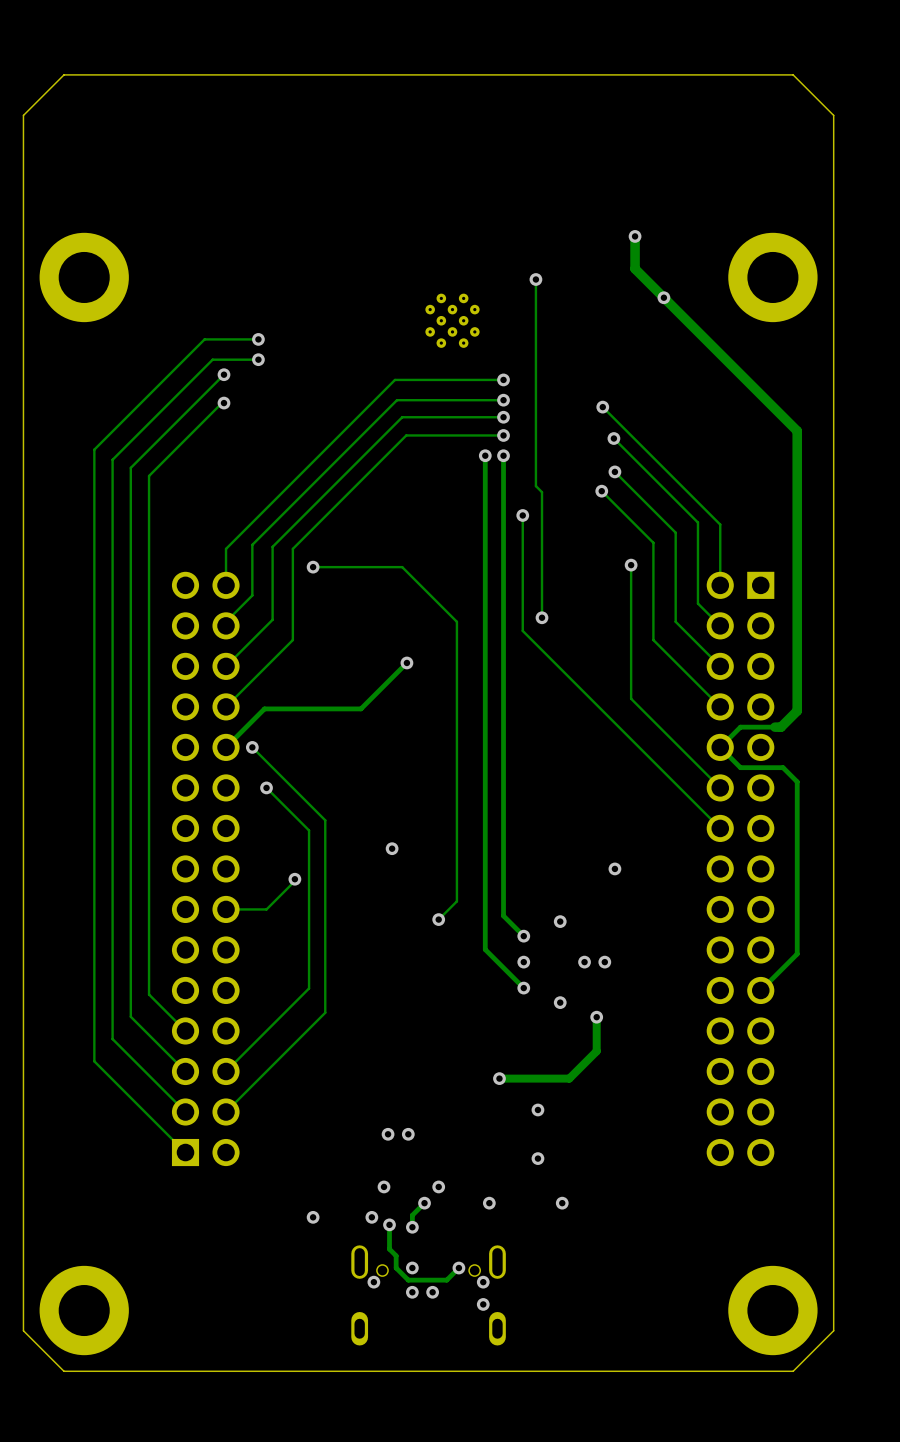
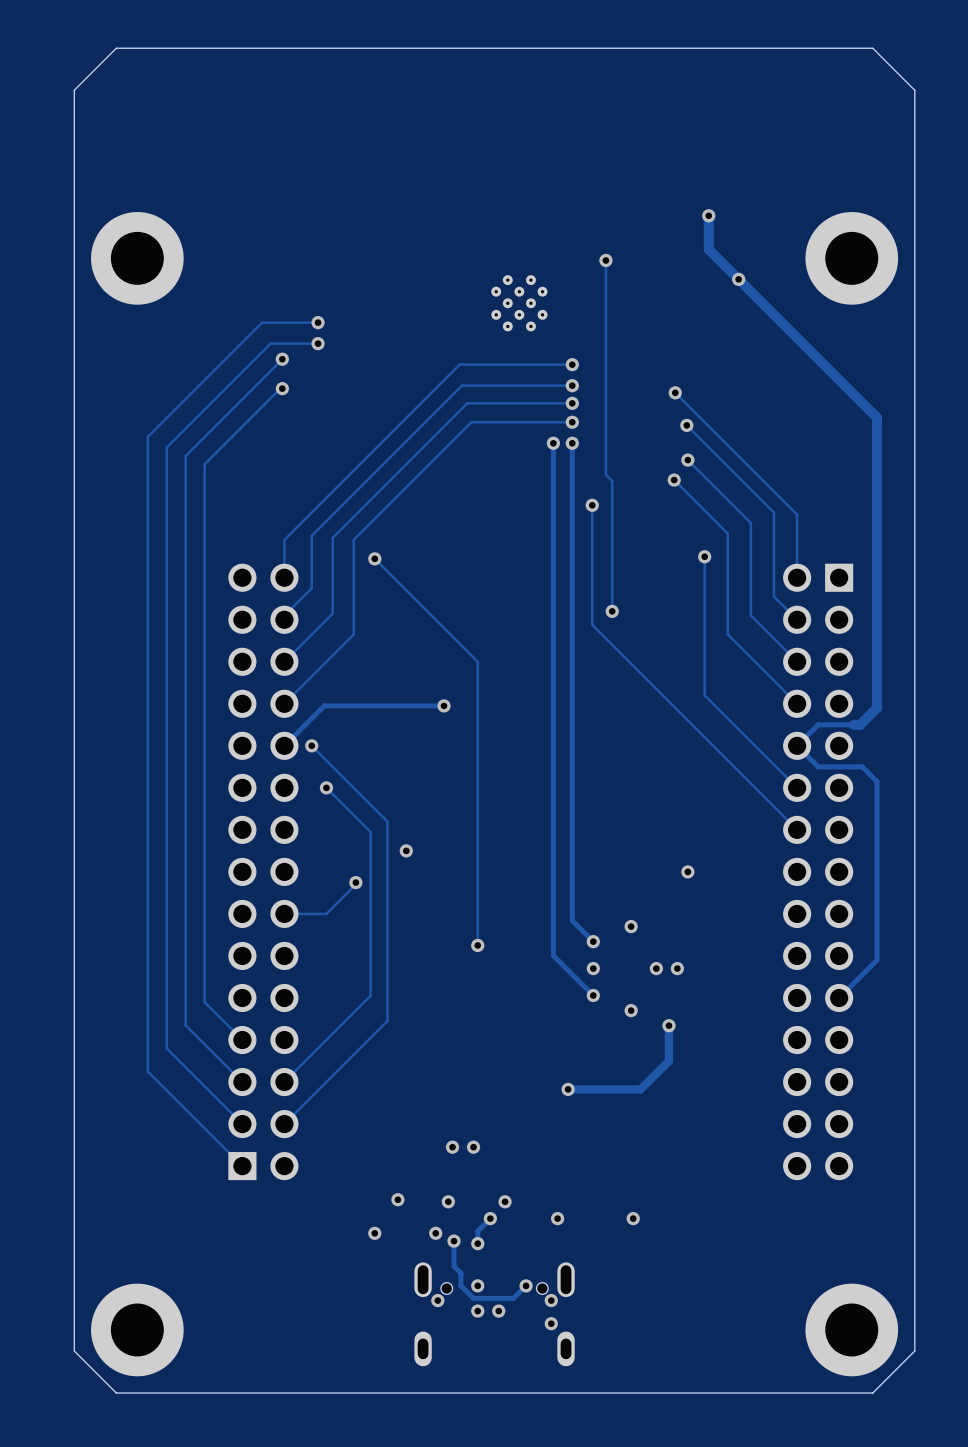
track: (313, 567) (402, 567) (456, 621) (456, 901) (438, 919) -> (374, 558) (477, 661) (477, 945)
track: (406, 662) (360, 708) -> (444, 705) (424, 705)
via position: (406, 662) -> (444, 705)
via: none -> (406, 850)
via: (392, 848) -> none
via position: (438, 919) -> (477, 945)
via: (537, 1109) -> none
via: (537, 1158) -> none
via: none -> (397, 1199)

